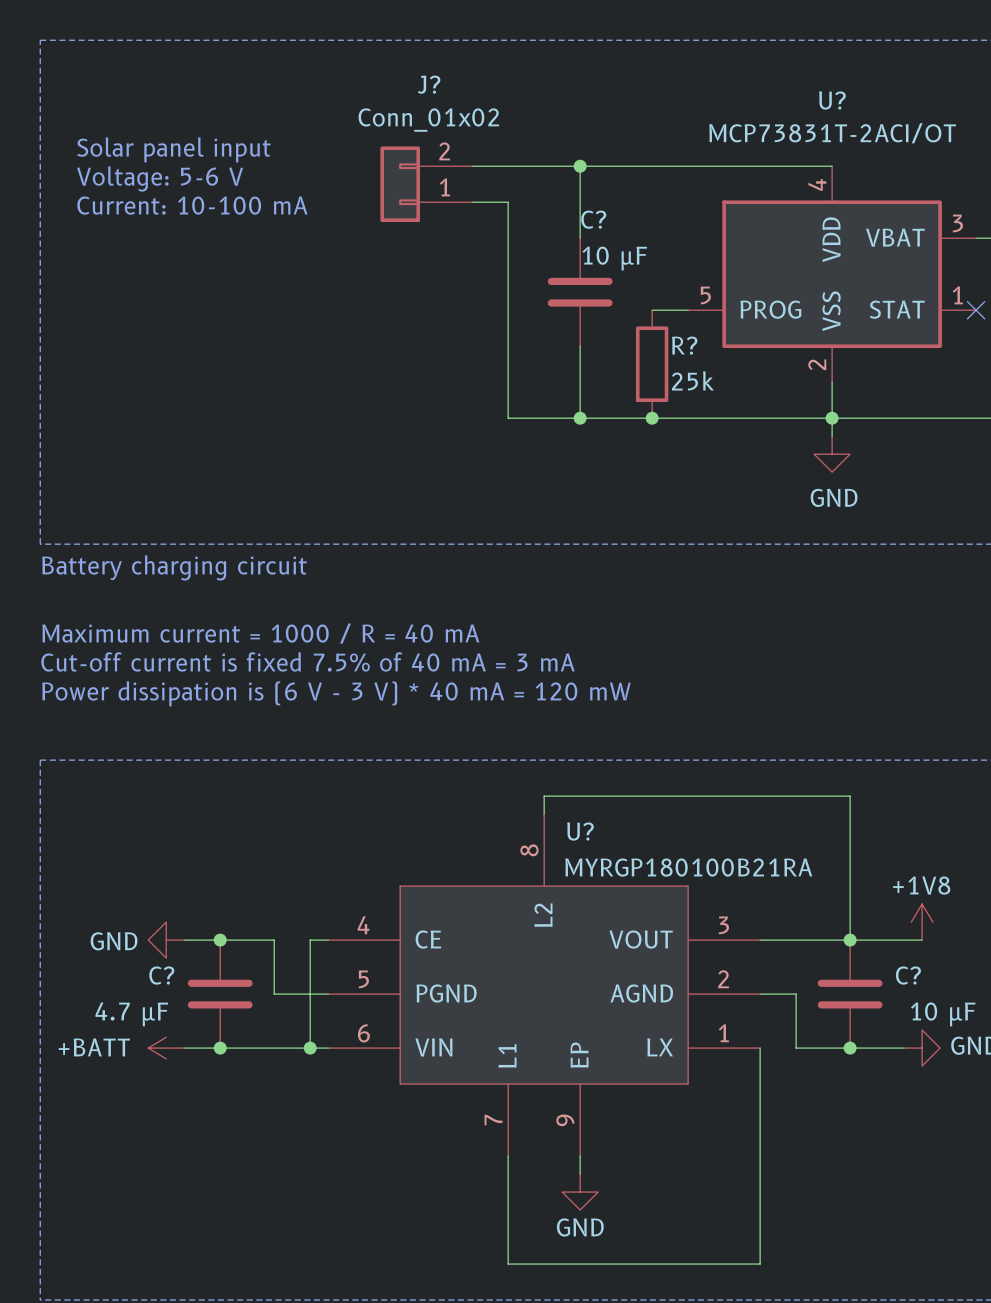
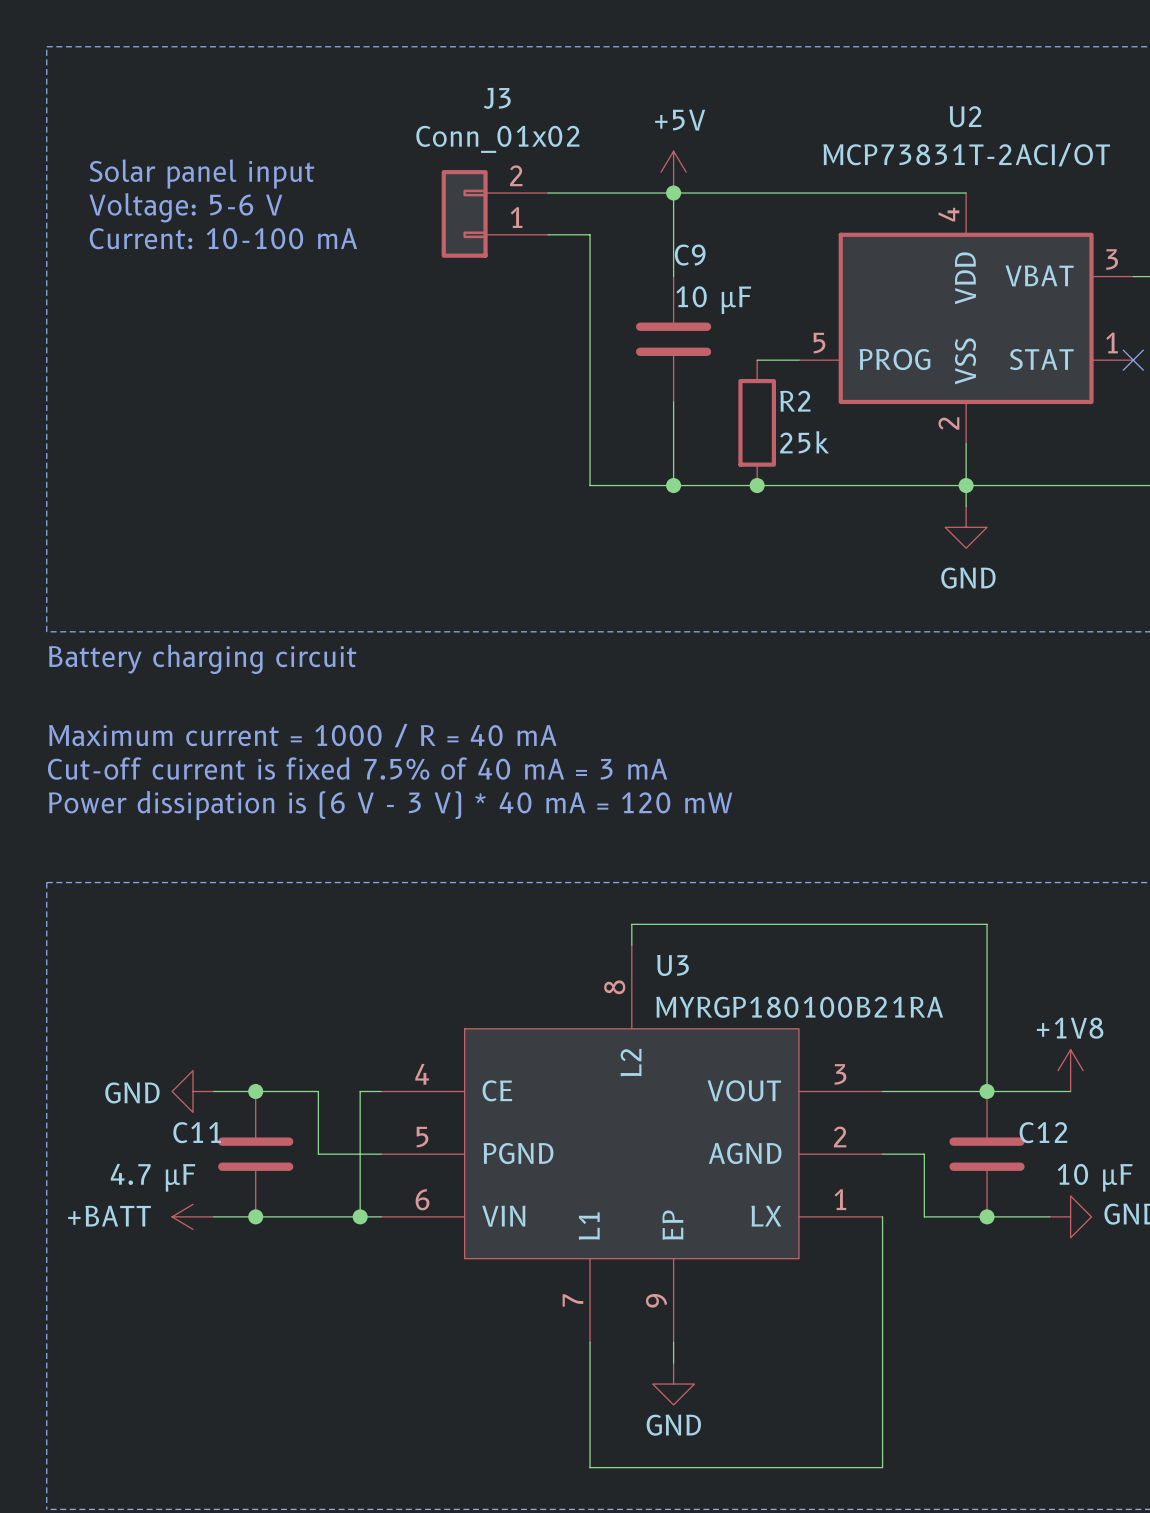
J? name: J? (429, 84) -> J3 (497, 98)
U? name: U? (832, 100) -> U2 (965, 116)
power symbol: none -> +5V (673, 172)
C? name: C? (593, 219) -> C9 (690, 255)
R? name: R? (684, 345) -> R2 (795, 401)
U? name: U? (580, 831) -> U3 (672, 965)
C? name: C? (161, 975) -> C11 (197, 1132)
C? name: C? (908, 975) -> C12 (1043, 1132)

